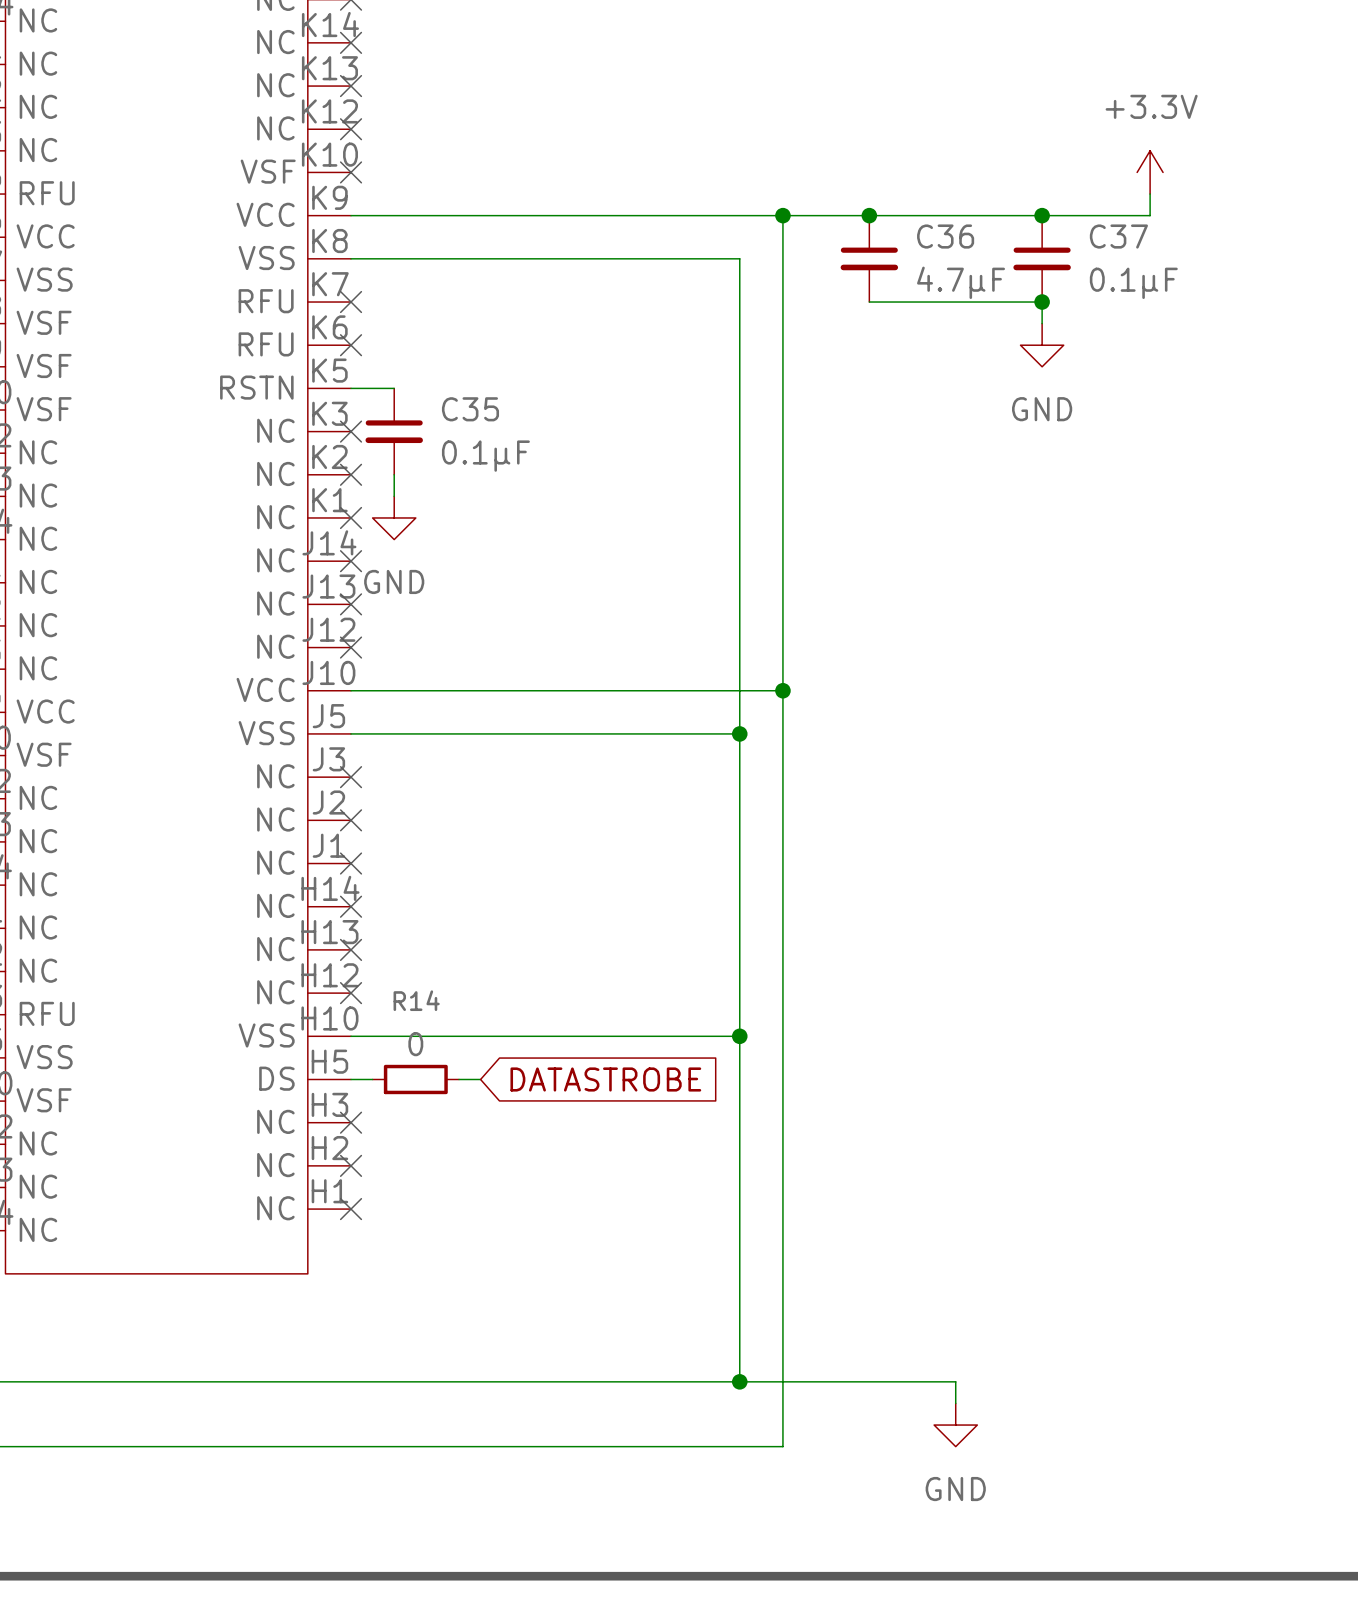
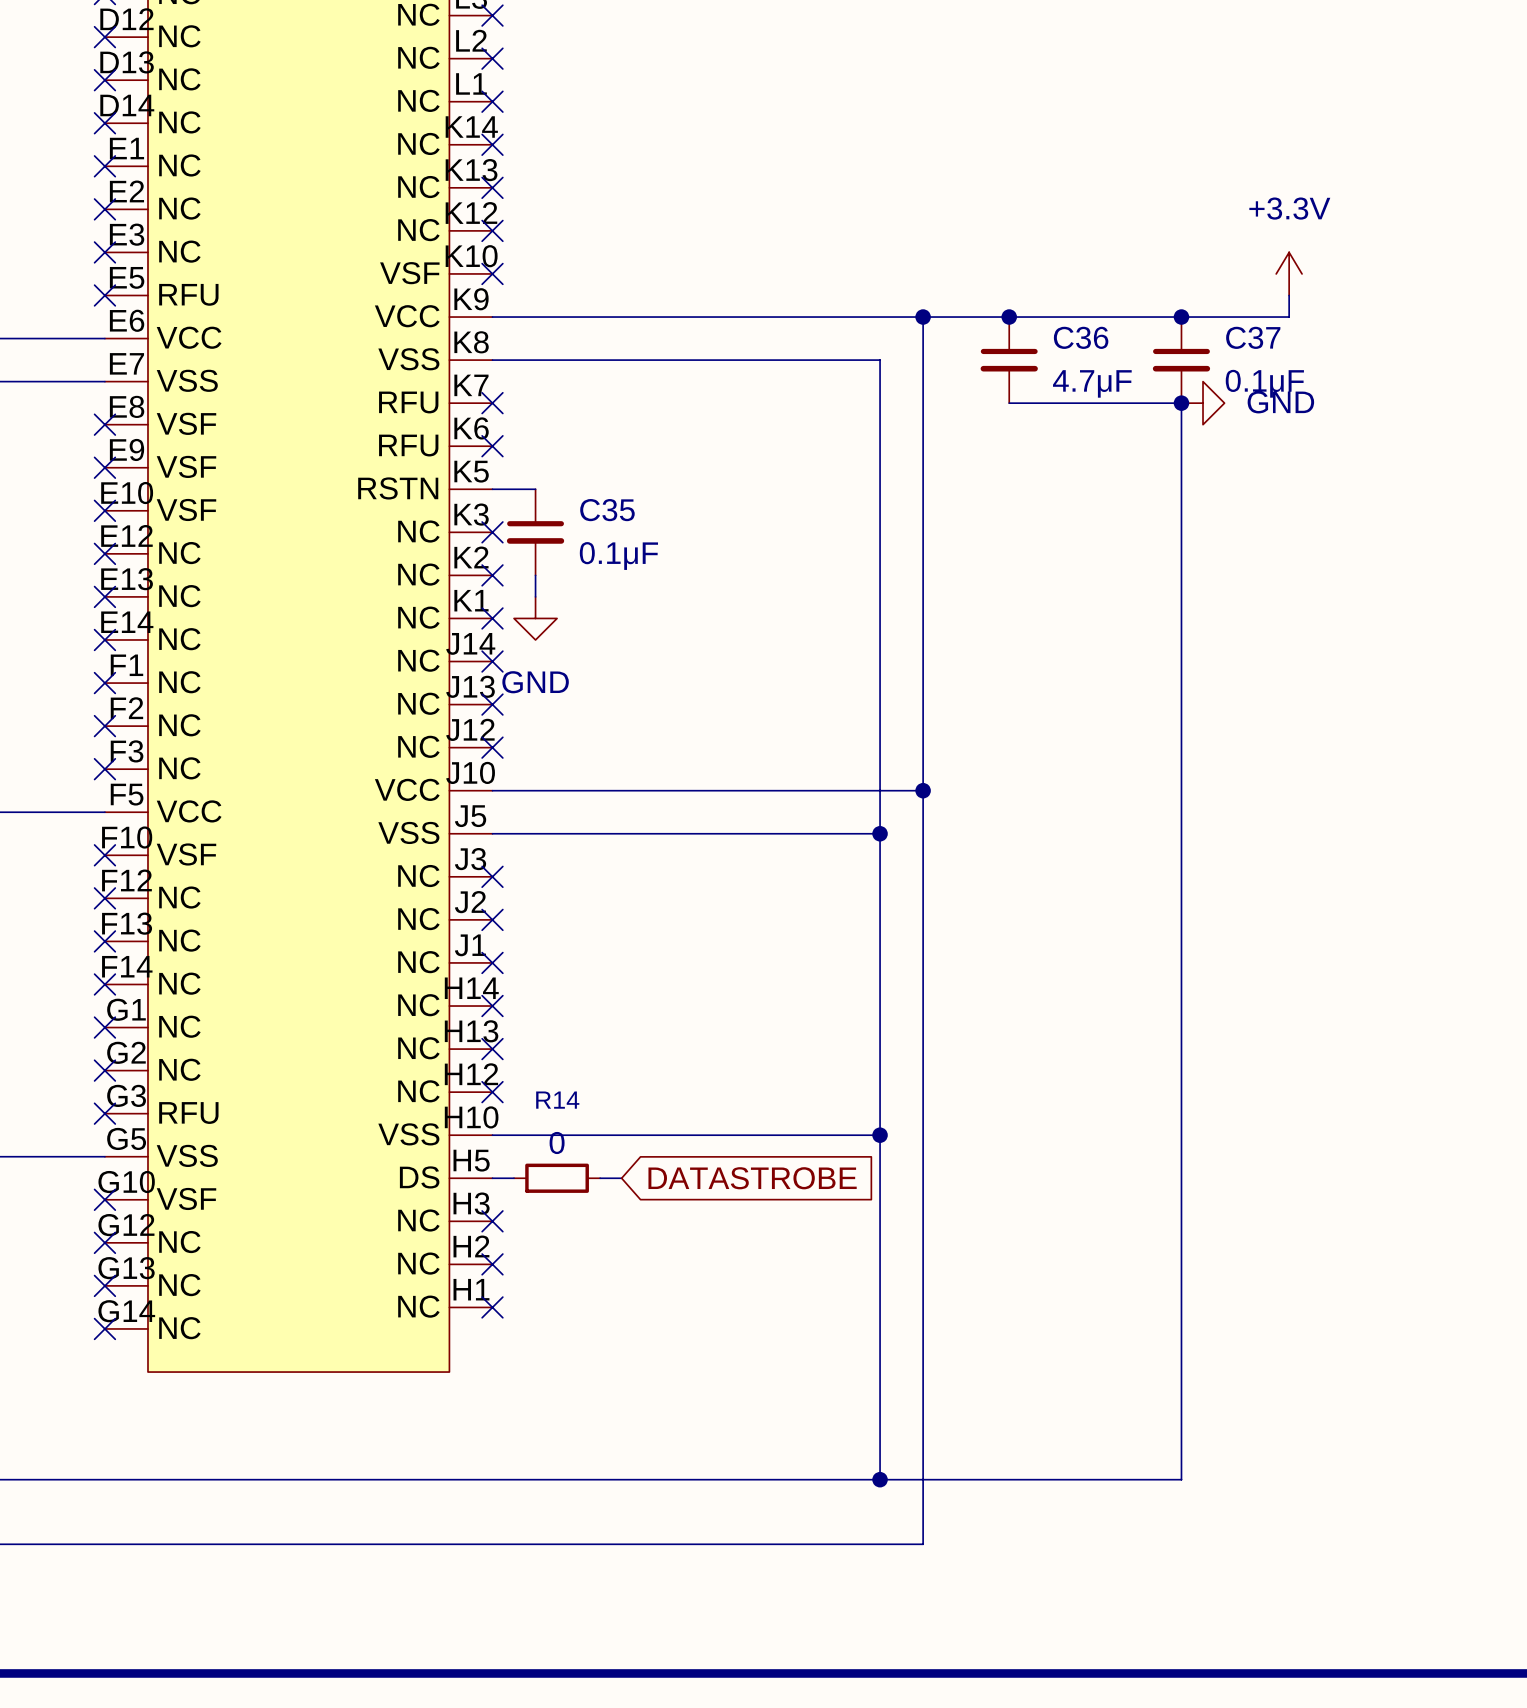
power symbol rotation: 0° (1042, 345) -> 90° counterclockwise (1203, 403)
power symbol position: GND (1042, 345) -> GND (1203, 403)
wire: (955, 1381) (955, 1403) -> (1095, 1479) (1181, 1479) (1181, 424)
power symbol: GND (955, 1425) -> none

